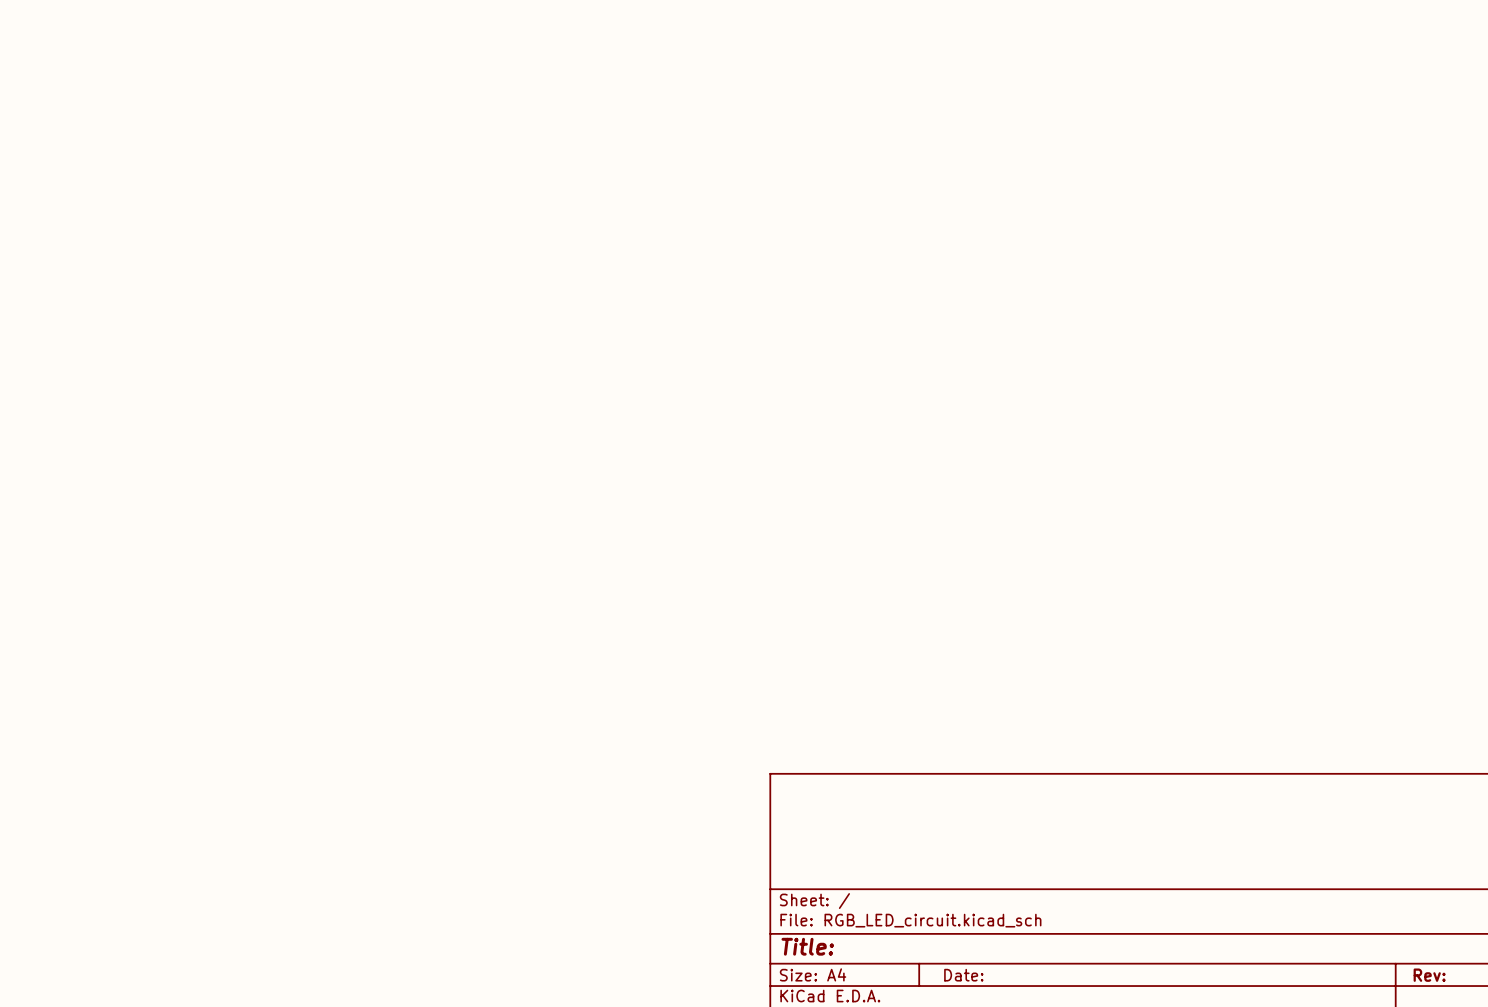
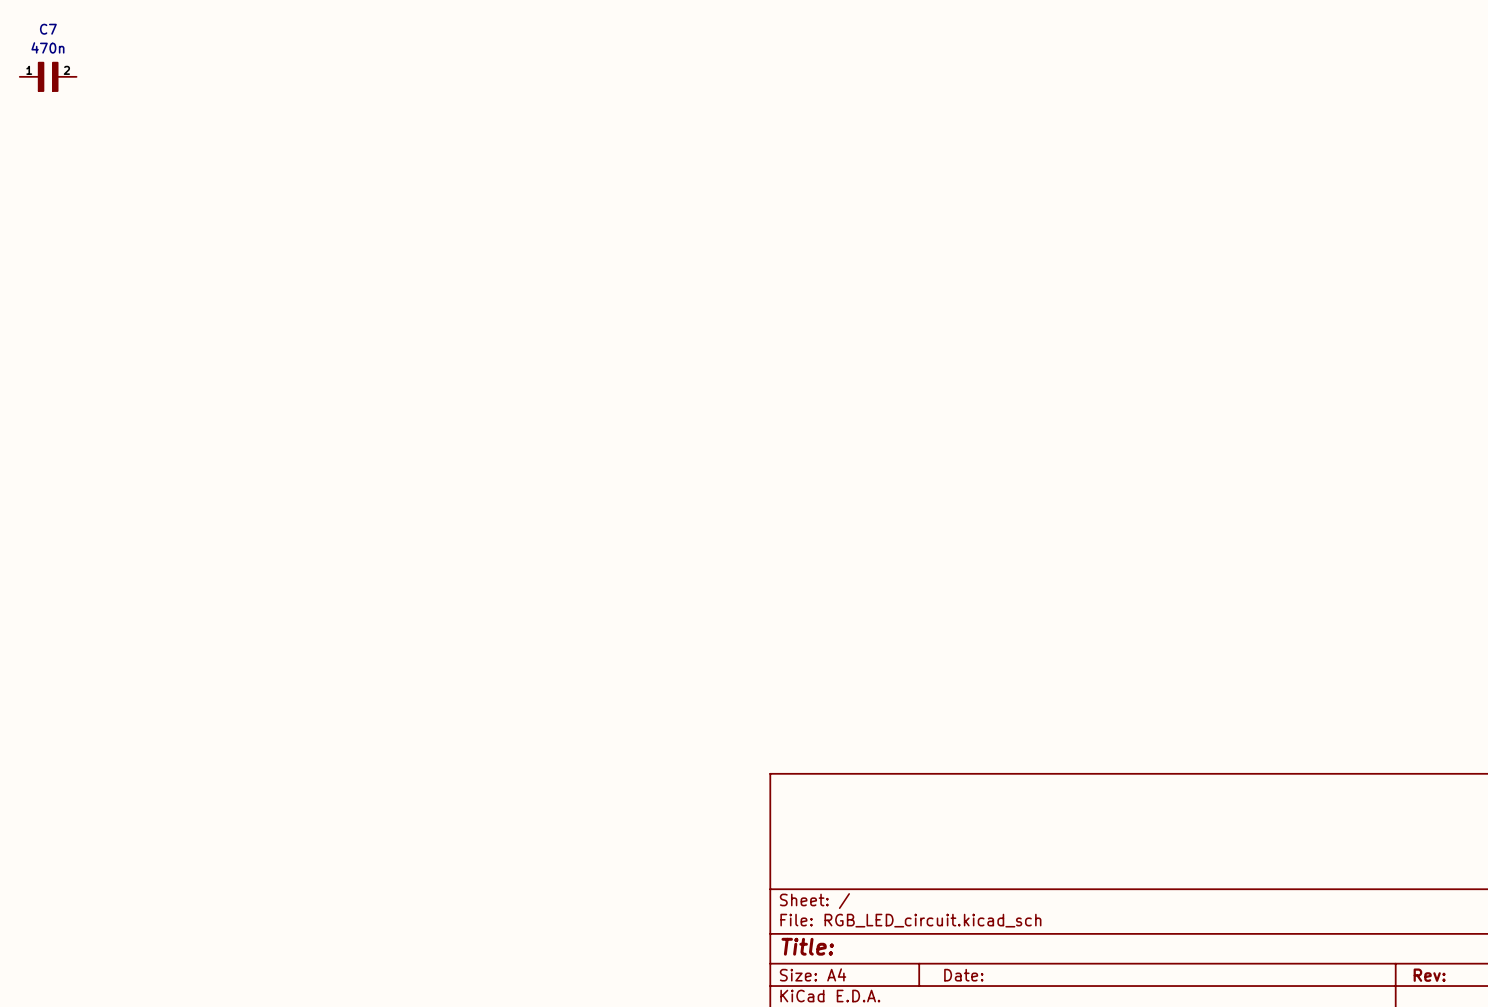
C7: none -> 470n (48, 76)

